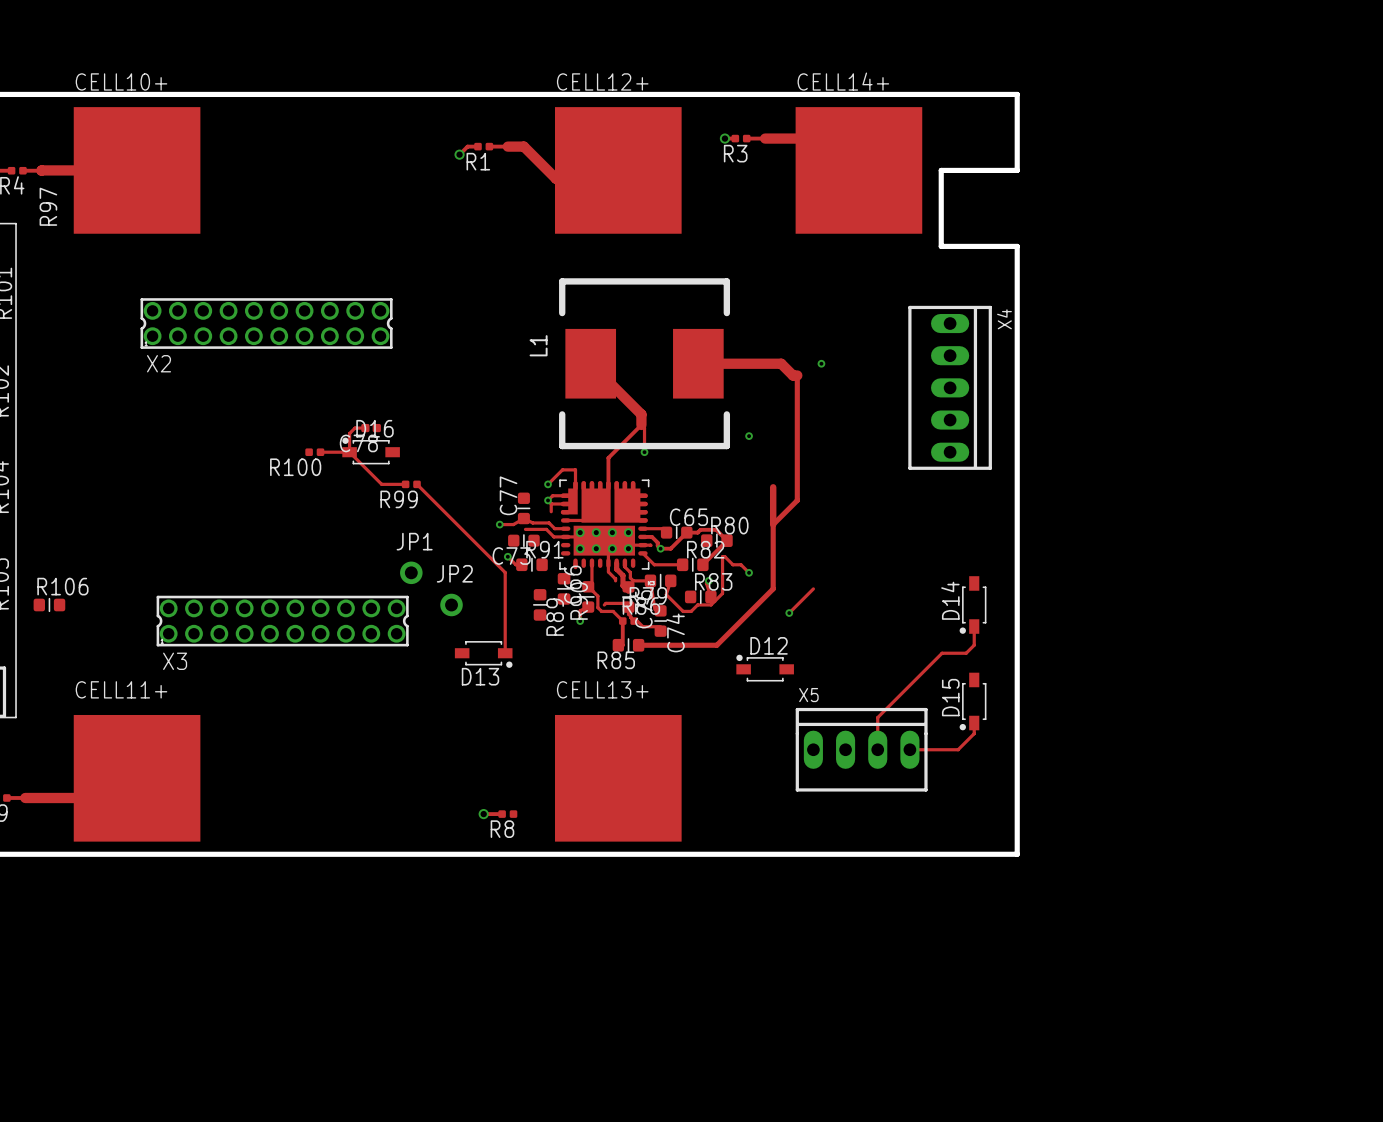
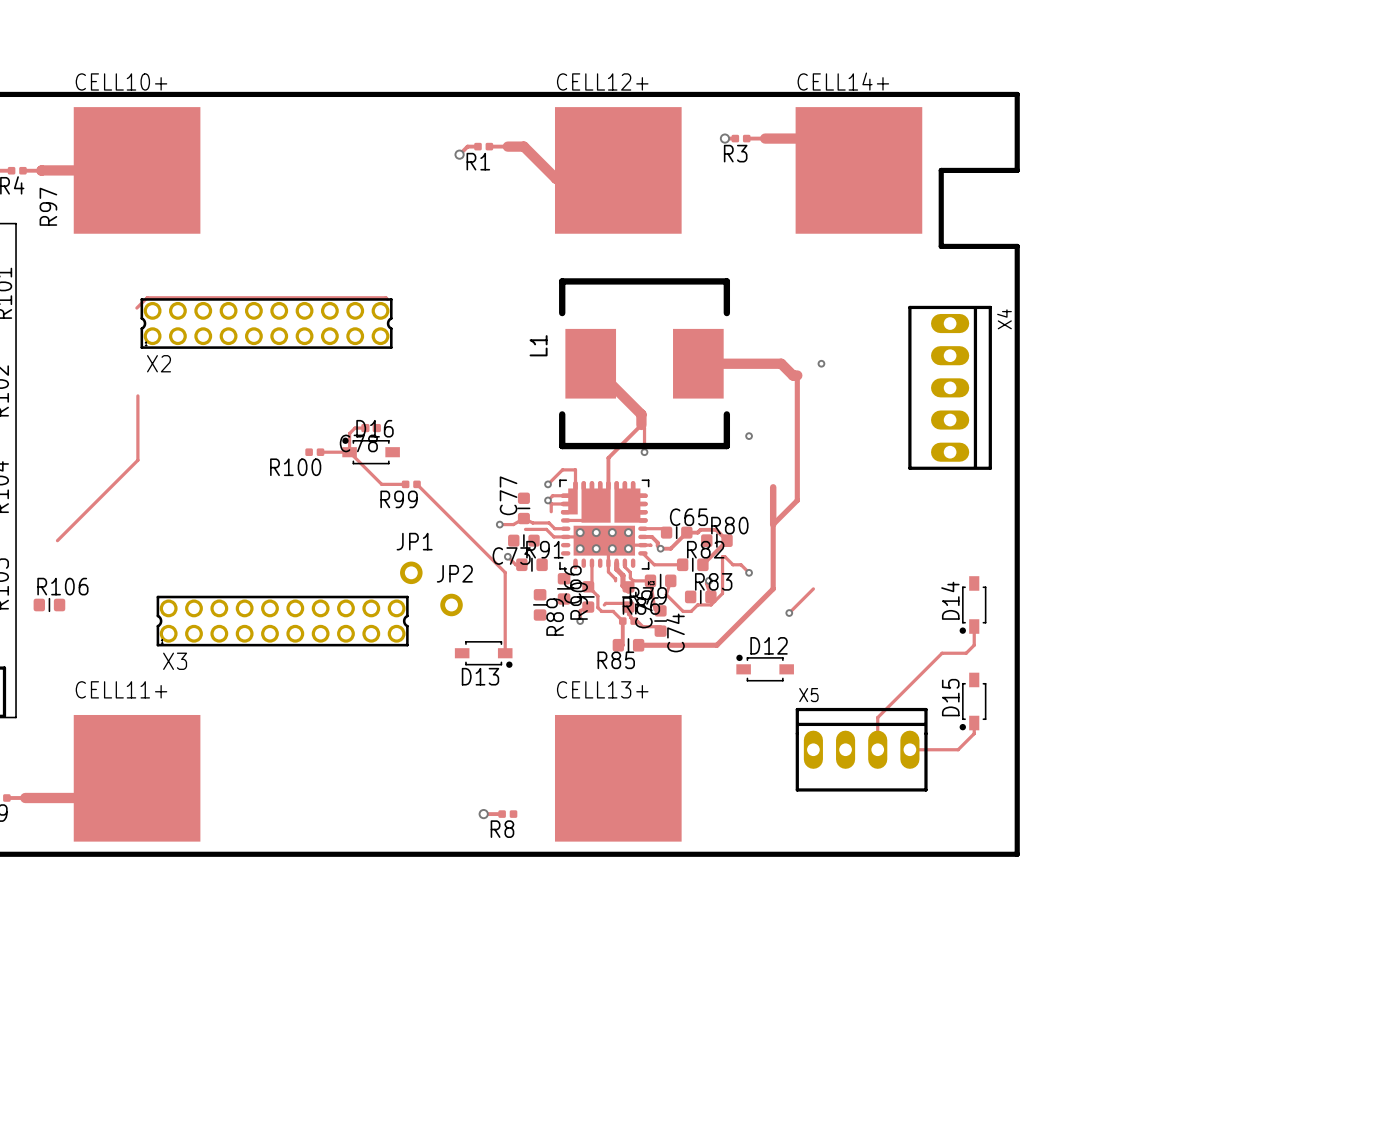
track: none -> (387, 299) (385, 297) (147, 297) (136, 308)
track: none -> (137, 395) (137, 460) (57, 540)

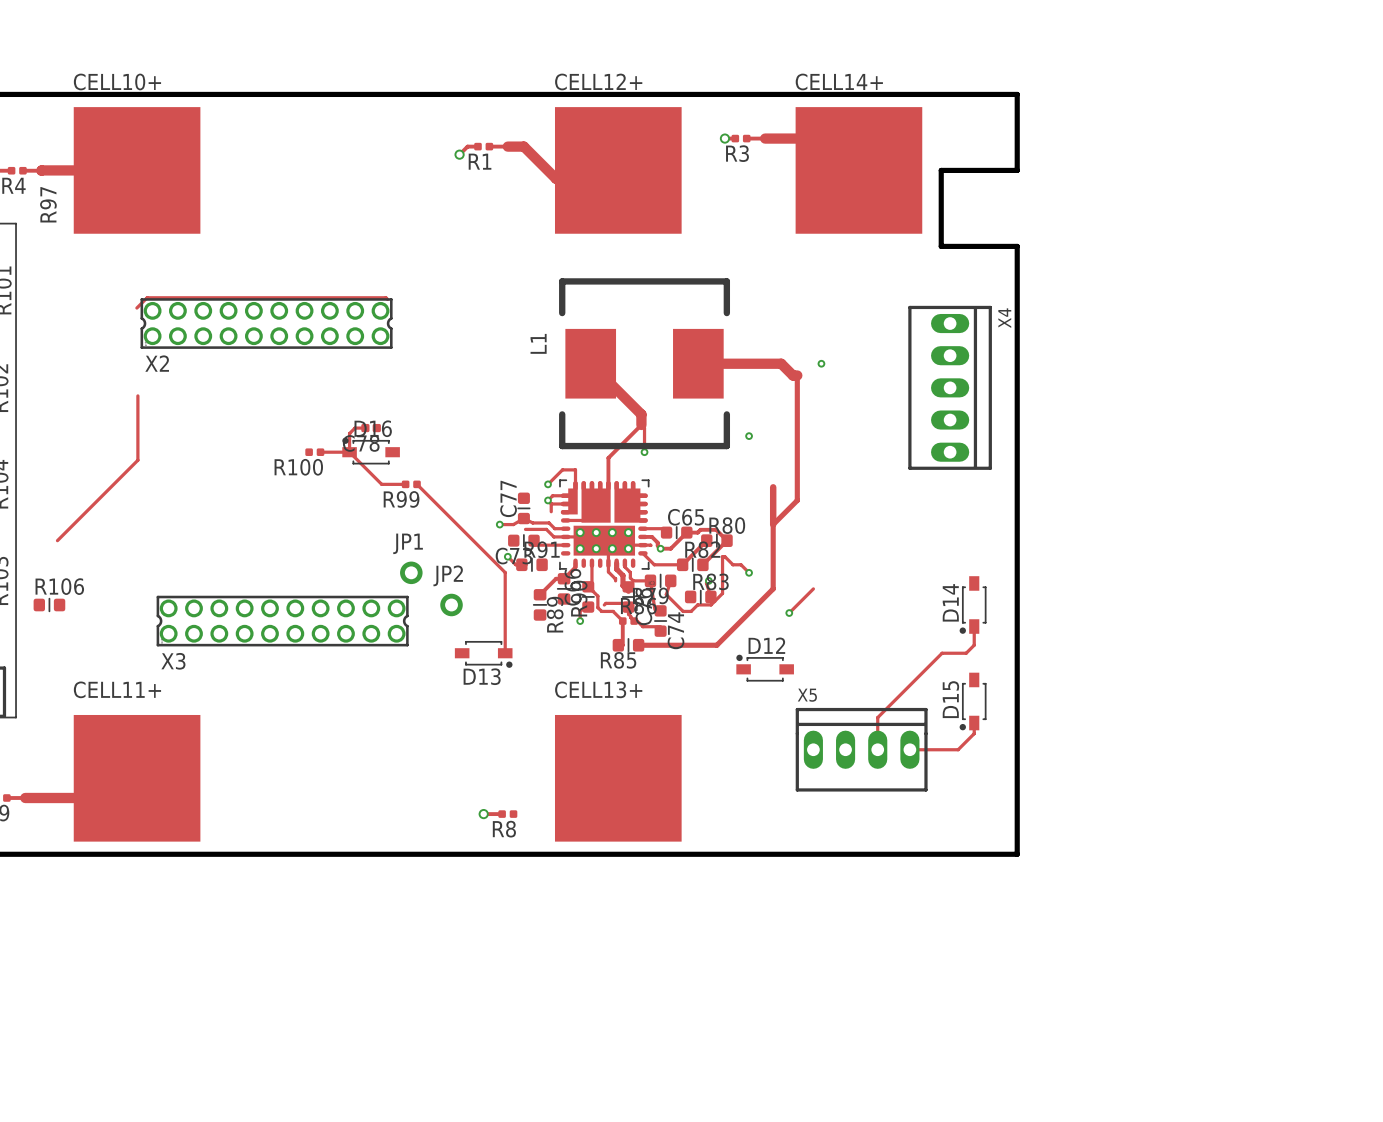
track: none -> (534, 540) (534, 545) (565, 545)
track: none -> (706, 540) (682, 564)
track: none -> (575, 567) (564, 578) (556, 578) (540, 594)

